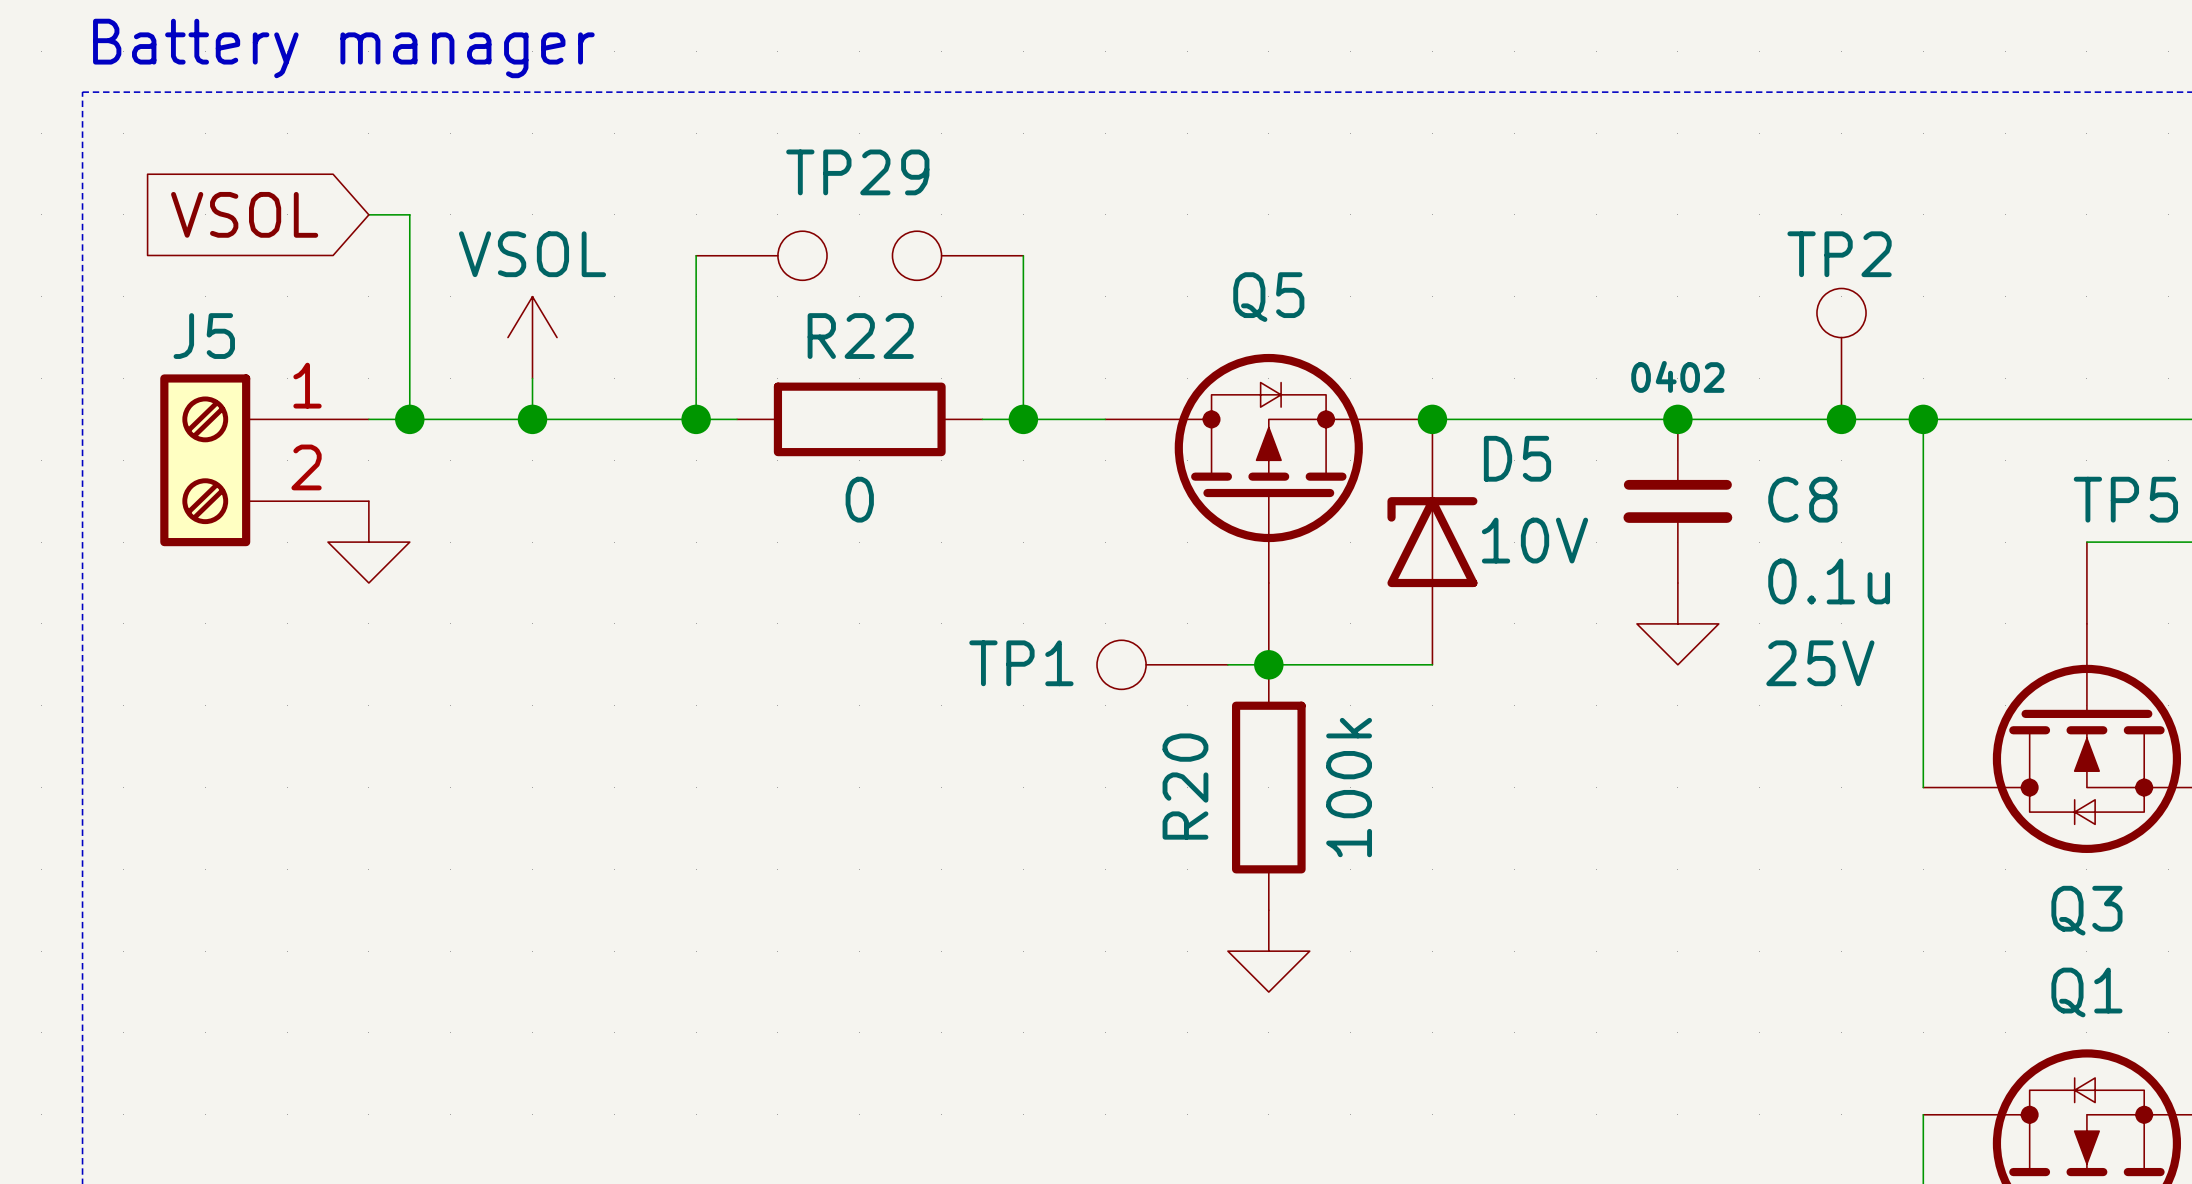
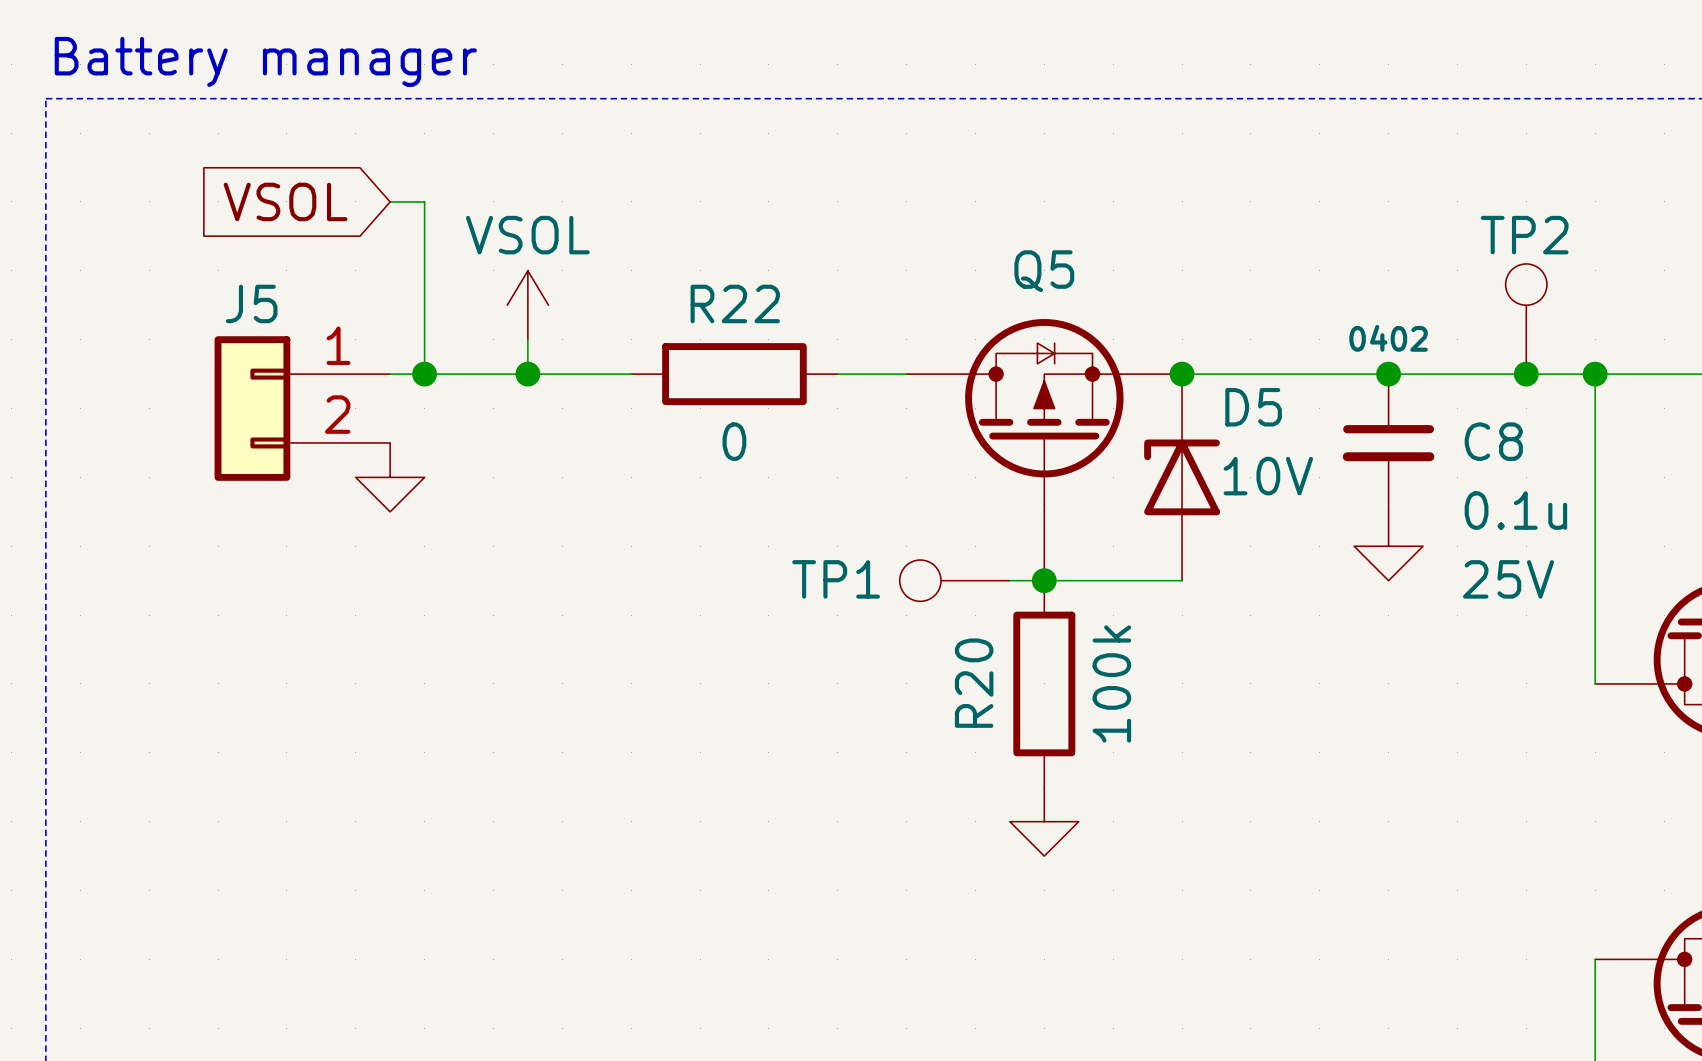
global label position: VSOL (244, 214) -> VSOL (285, 201)
wire: (368, 214) (409, 214) (409, 419) -> none
wire: none -> (390, 201) (424, 201) (424, 339)
wire: (696, 255) (696, 419) -> none
TP29: (859, 255) -> none
wire: (1023, 255) (1023, 419) (982, 419) -> none
power symbol position: VSOL (532, 337) -> VSOL (527, 305)
J5 symbol: [160, 374, 369, 547] -> [214, 336, 391, 481]
wire: none -> (527, 339) (527, 374)
junction: (409, 419) -> none
junction position: (696, 419) -> (527, 374)
R22 position: (859, 419) -> (734, 374)
junction: (1023, 419) -> none
power symbol position: (368, 542) -> (390, 477)

